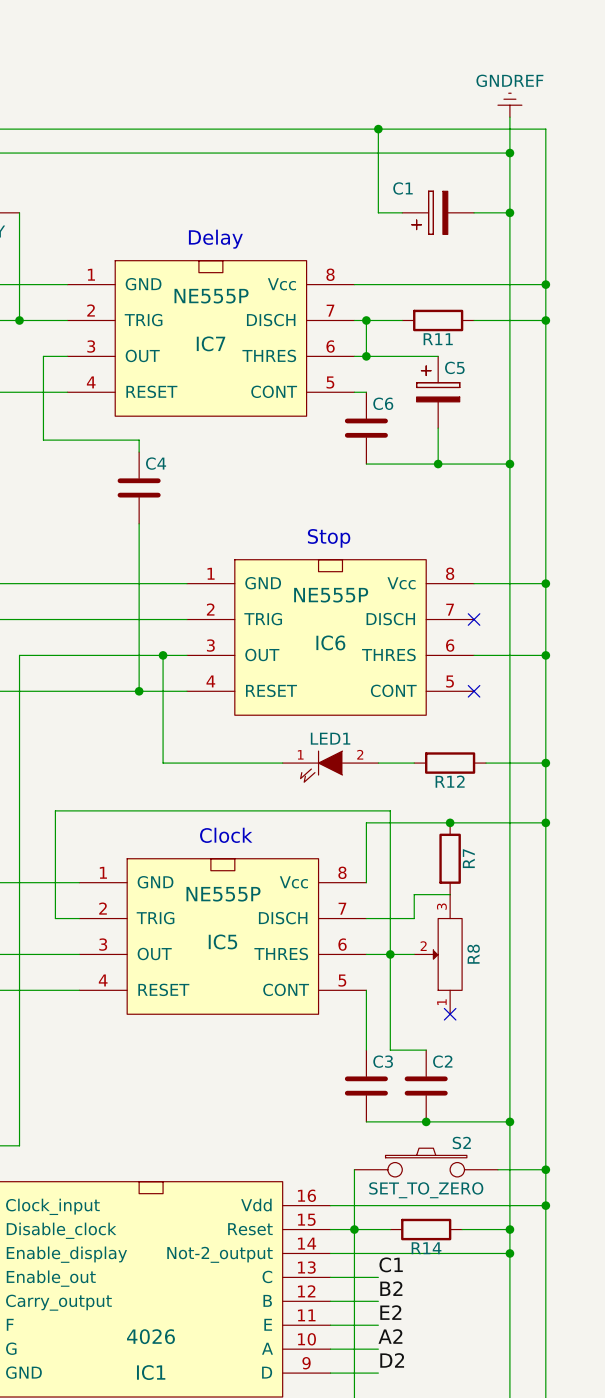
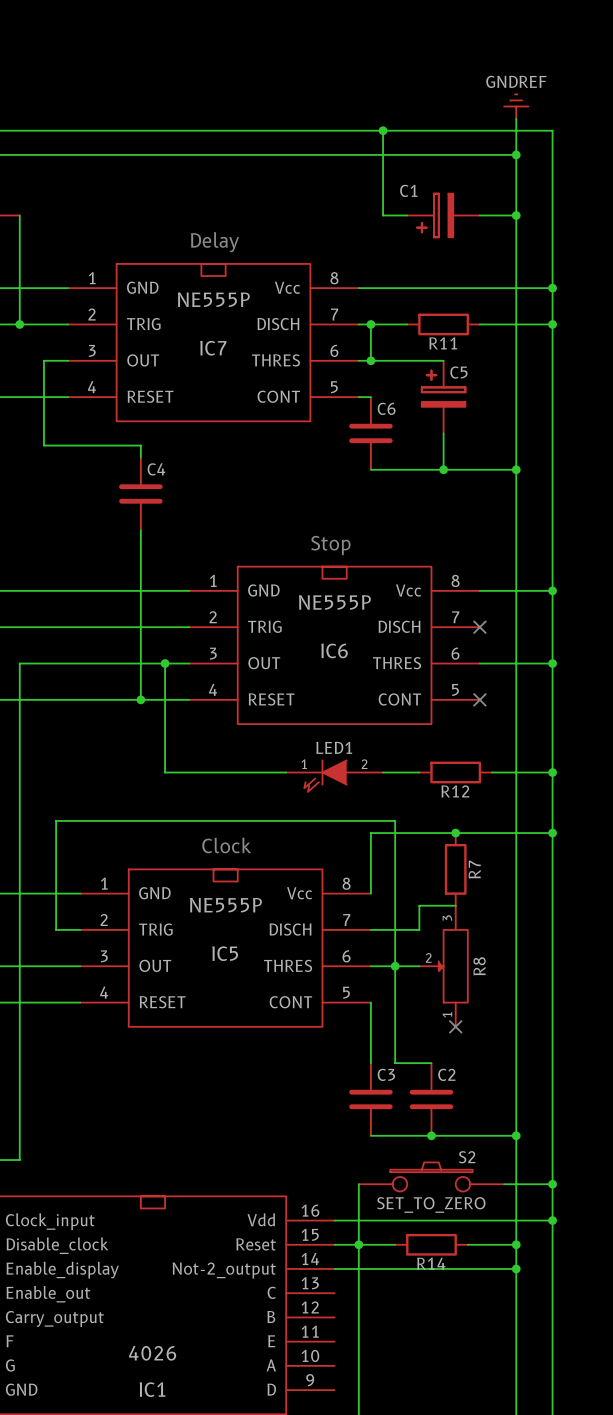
label: C1 (391, 1264) -> none
wire: (330, 1277) (378, 1277) -> none
label: B2 (391, 1288) -> none
wire: (330, 1301) (378, 1301) -> none
label: E2 (390, 1312) -> none
wire: (330, 1325) (378, 1325) -> none
label: A2 (390, 1336) -> none
wire: (330, 1349) (378, 1349) -> none
label: D2 (392, 1360) -> none
wire: (330, 1373) (378, 1373) -> none

